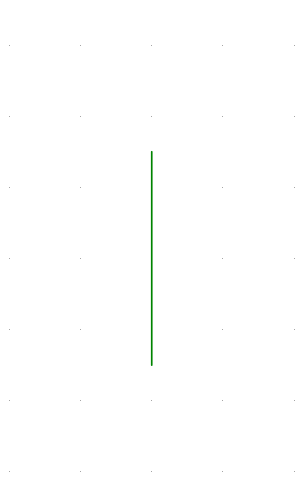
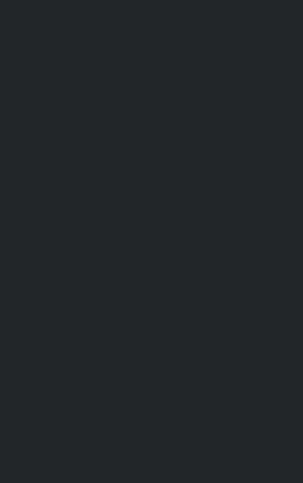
wire: (151, 151) (151, 365) -> none

